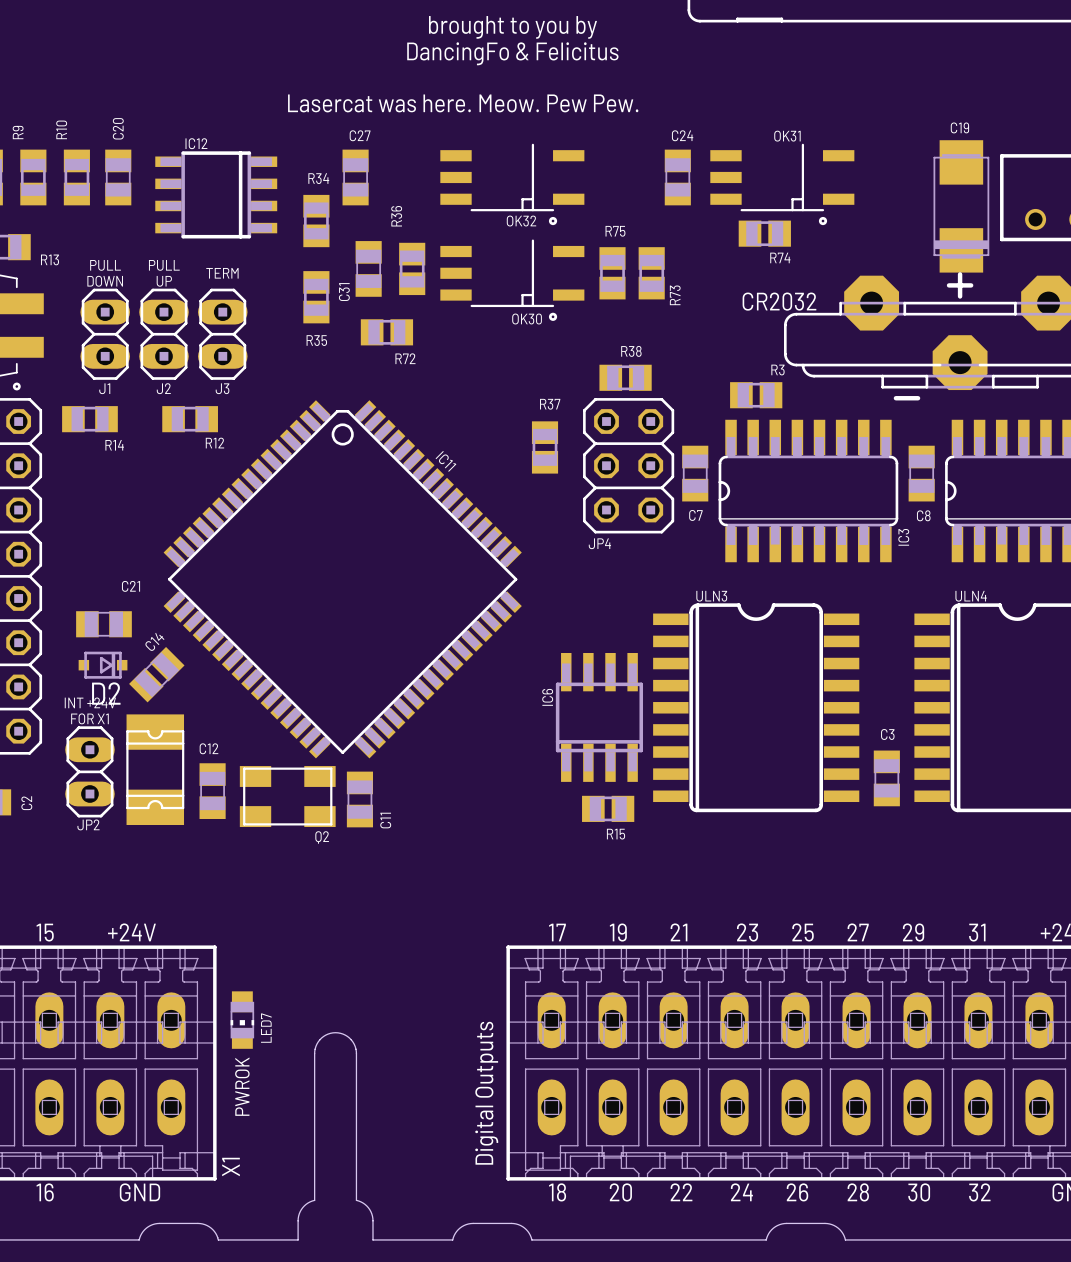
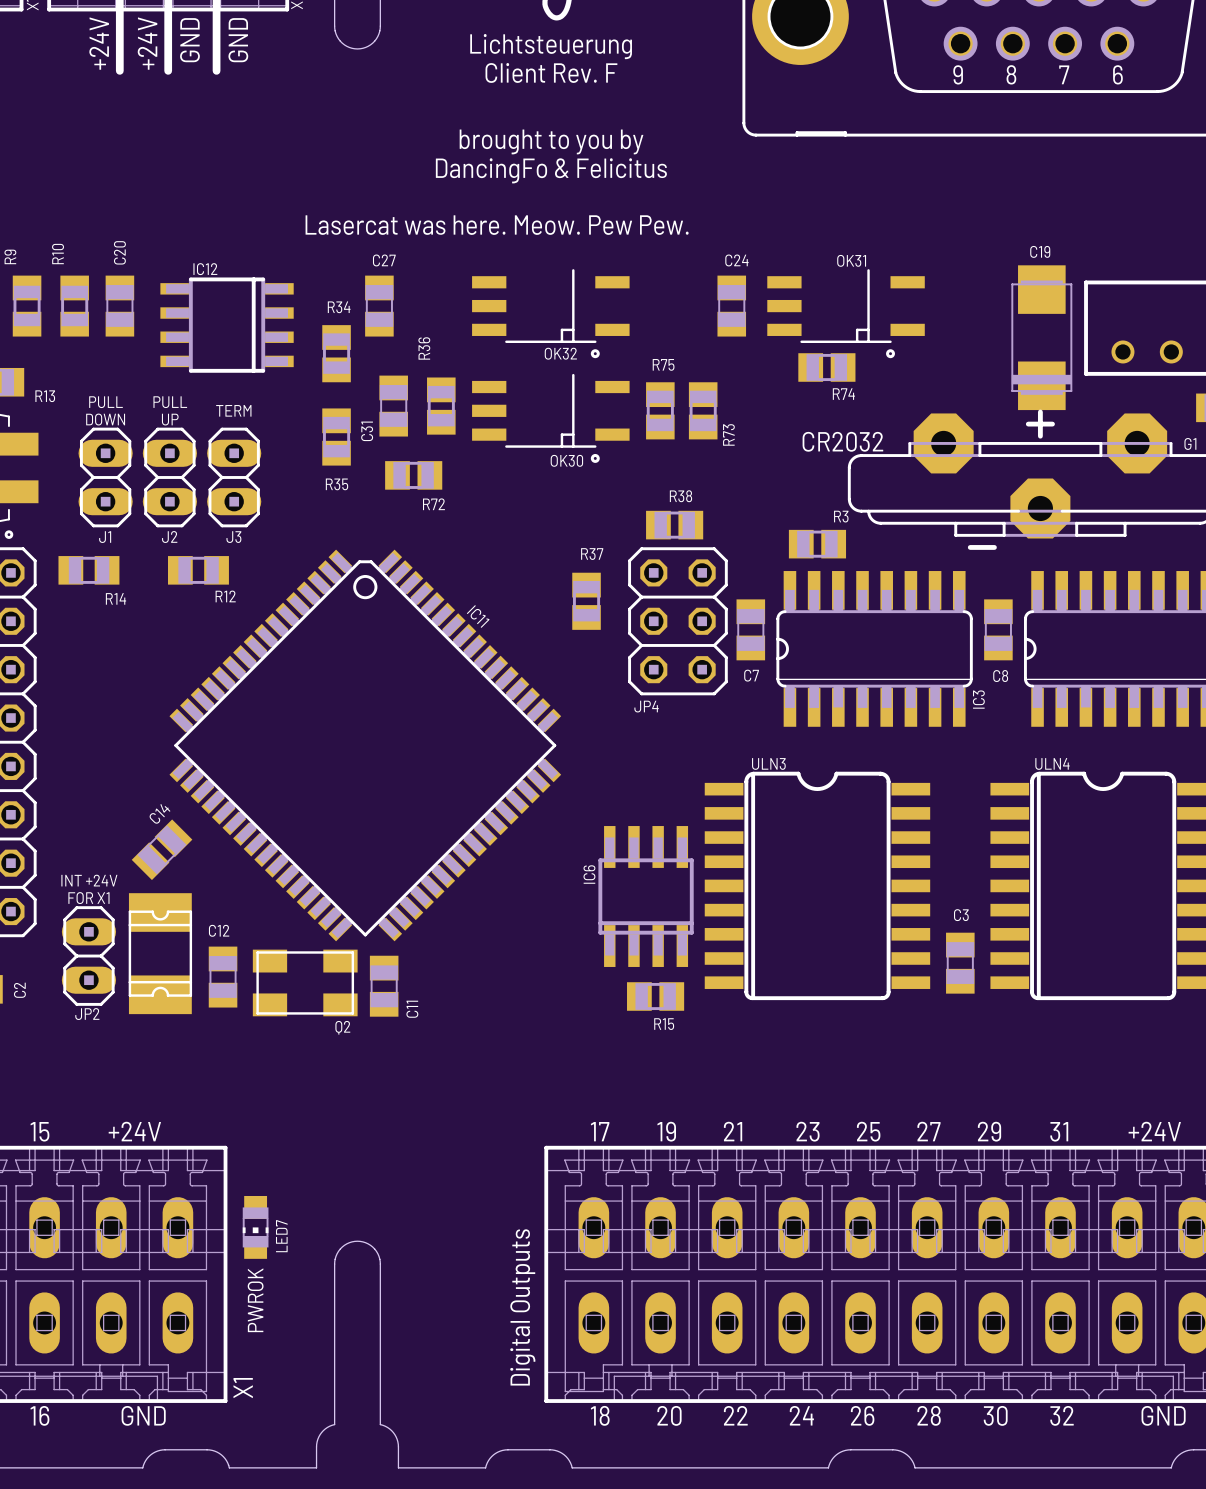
C21: (103, 624) -> none
D2: (103, 665) -> none

